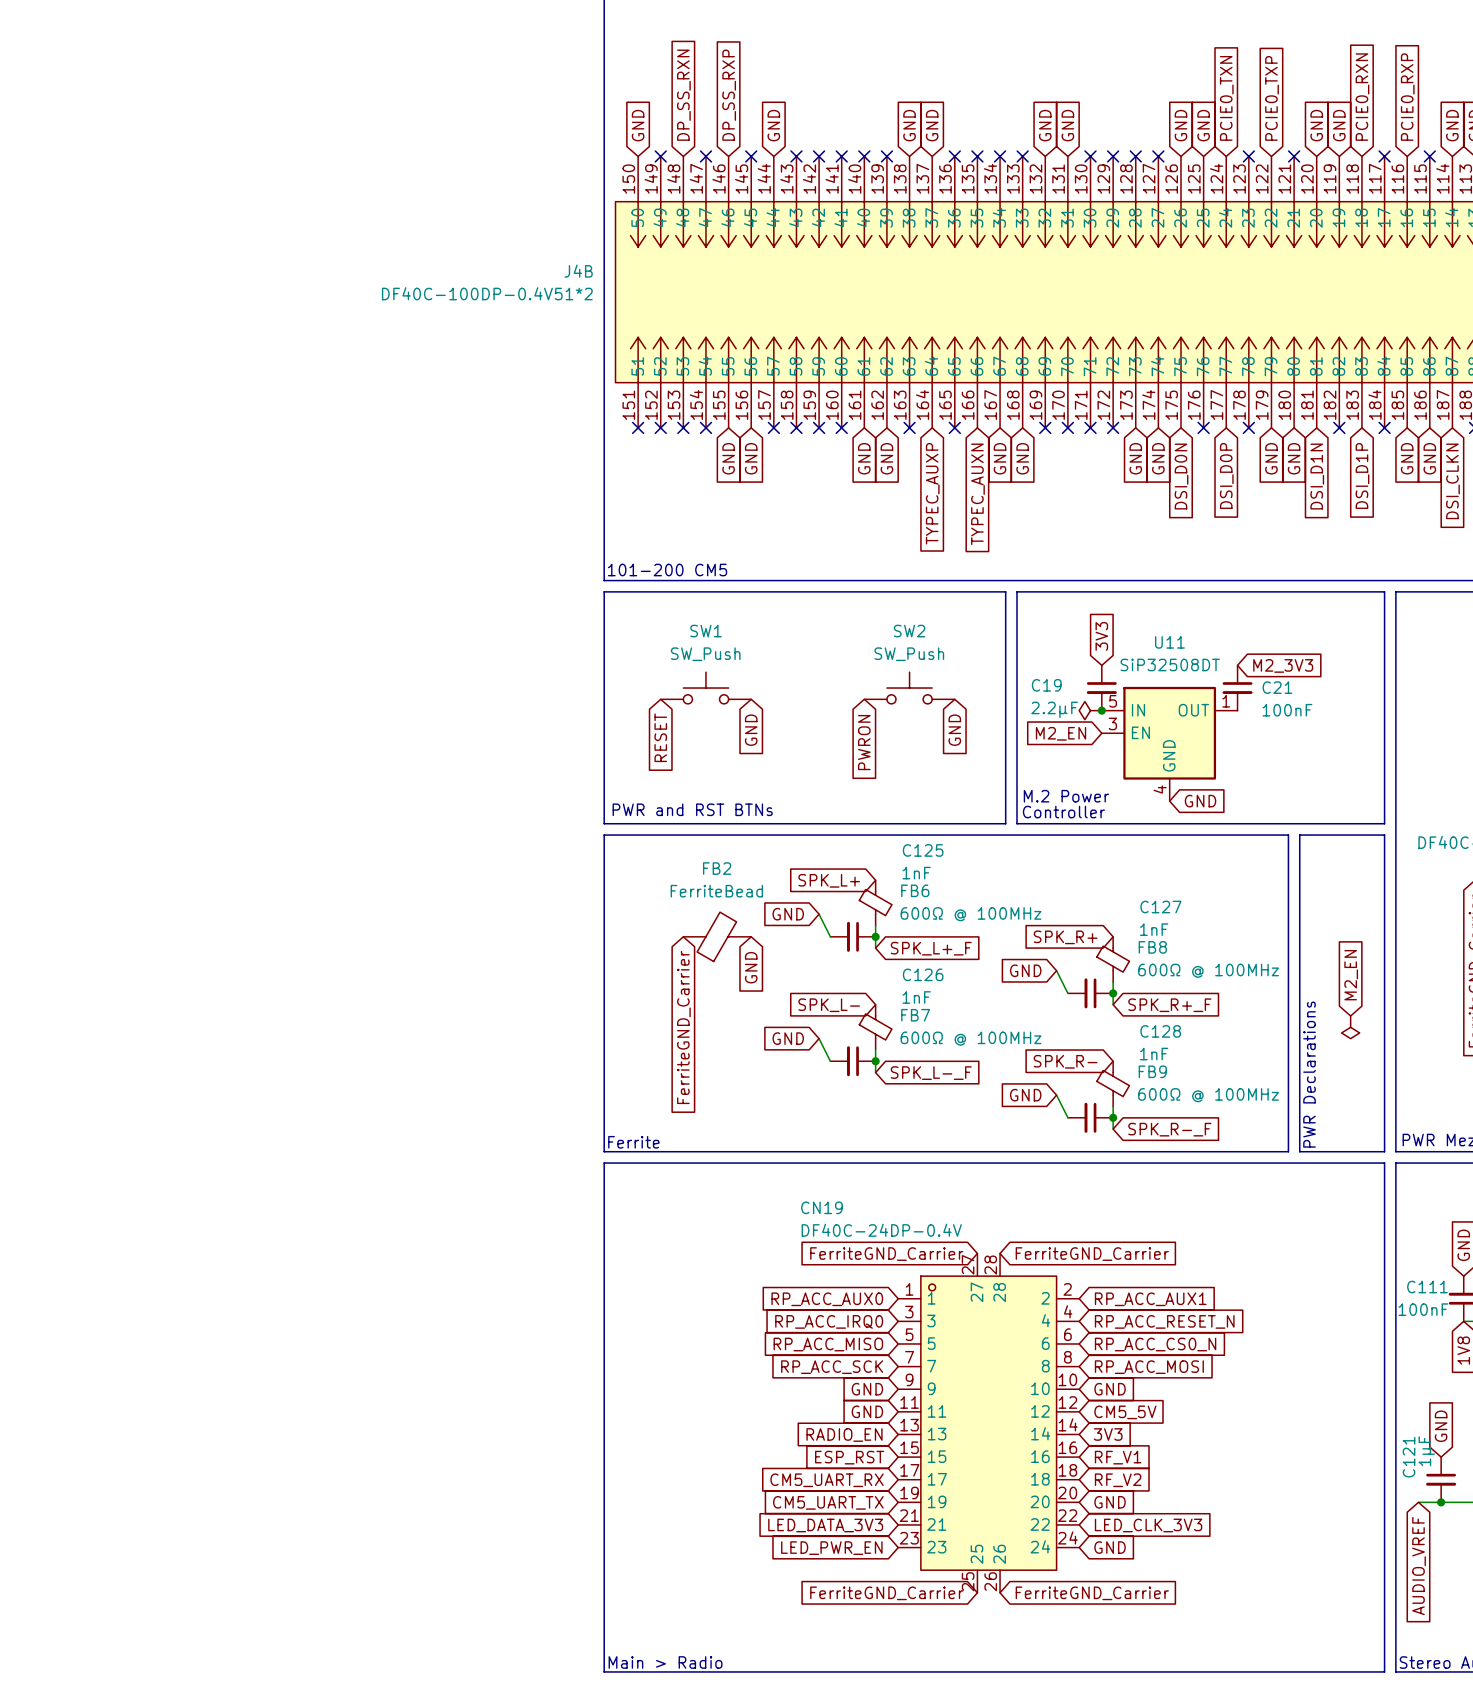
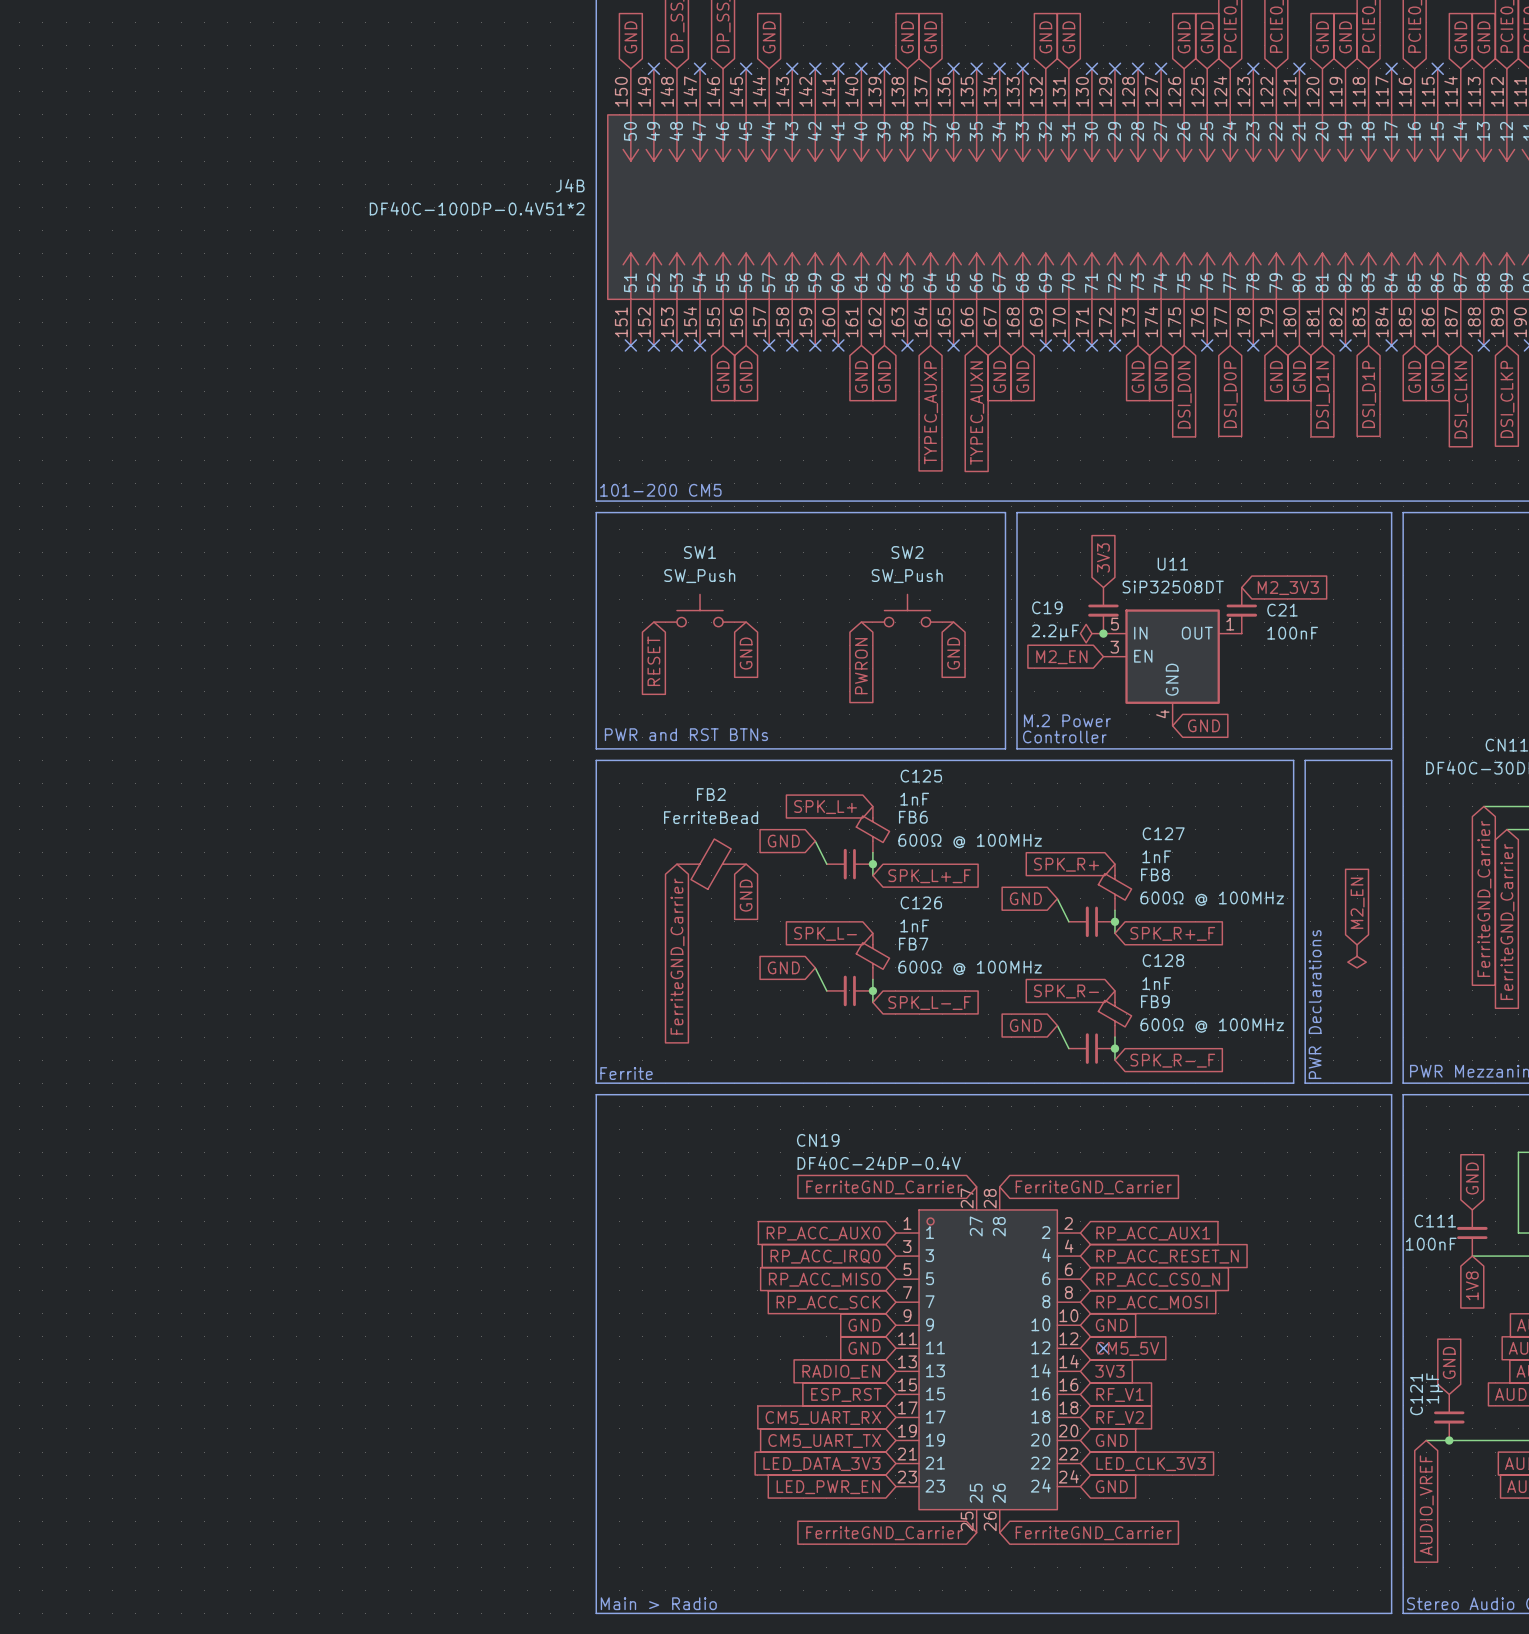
no-connect mark: none -> (1103, 1348)

